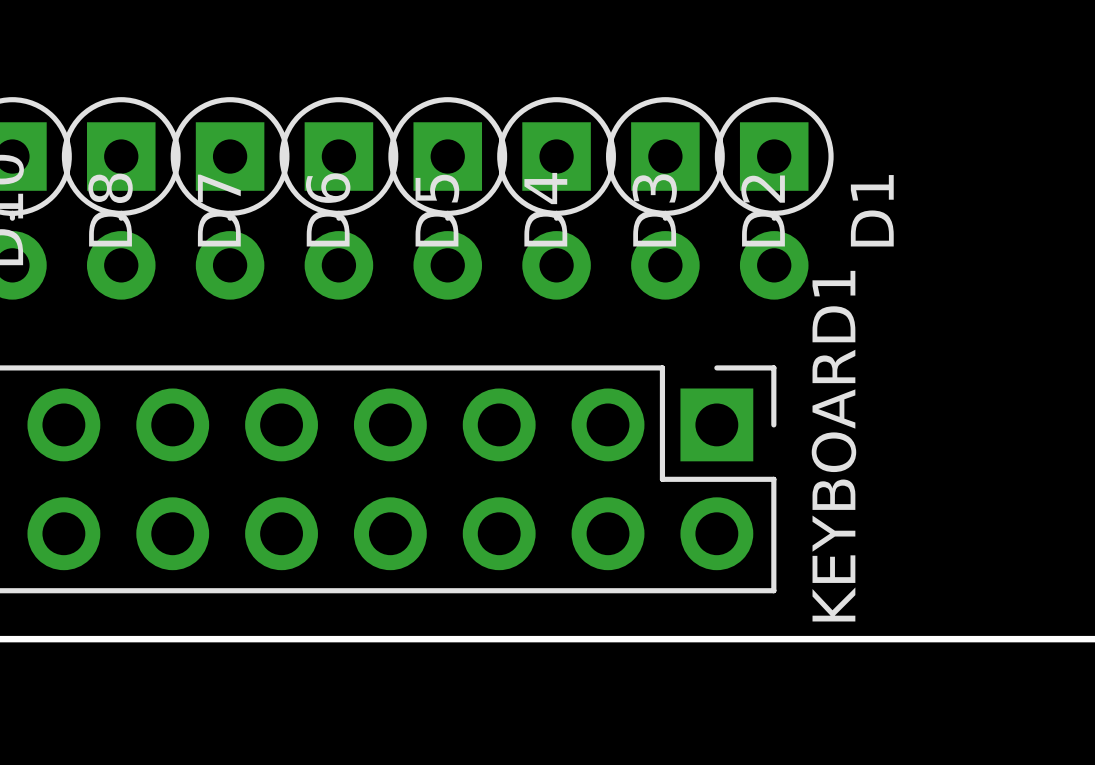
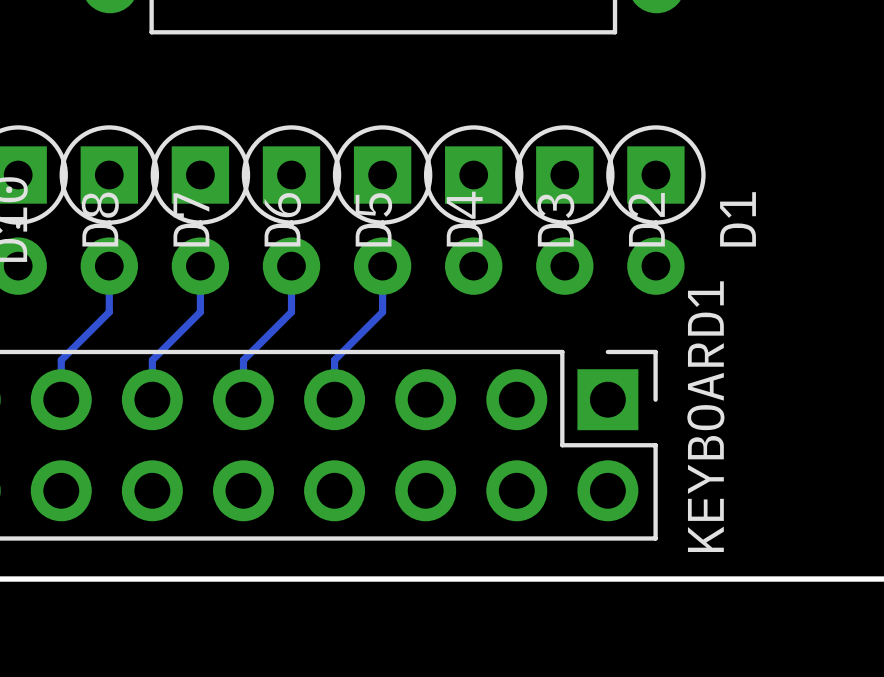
bottom track: none -> (109, 266) (109, 312) (61, 360) (61, 399)
bottom track: none -> (200, 266) (200, 312) (152, 360) (152, 399)
bottom track: none -> (291, 266) (291, 312) (243, 360) (243, 399)
bottom track: none -> (382, 266) (382, 312) (334, 360) (334, 399)

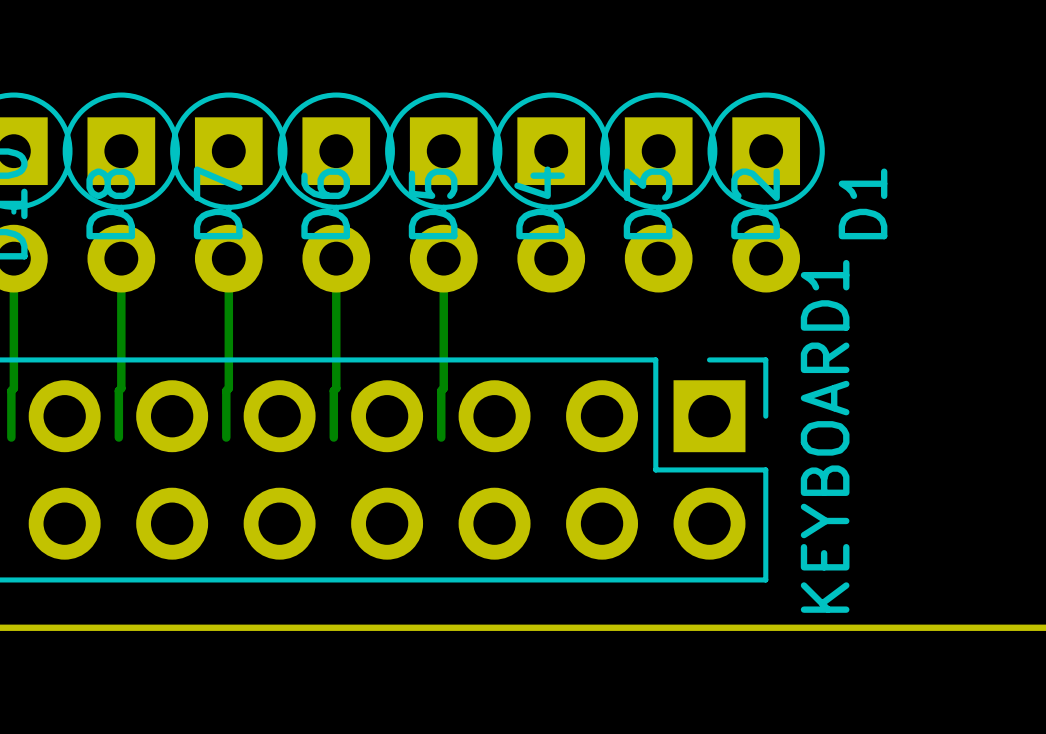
bottom track: none -> (13, 258) (13, 388) (11, 390) (11, 437)
bottom track: (109, 312) (61, 360) (61, 399) -> (121, 312) (121, 388) (118, 390) (118, 437)
bottom track: (200, 312) (152, 360) (152, 399) -> (228, 312) (228, 388) (226, 390) (226, 437)
bottom track: (291, 312) (243, 360) (243, 399) -> (336, 312) (336, 388) (333, 390) (333, 437)
bottom track: (382, 312) (334, 360) (334, 399) -> (443, 312) (443, 388) (441, 390) (441, 437)

